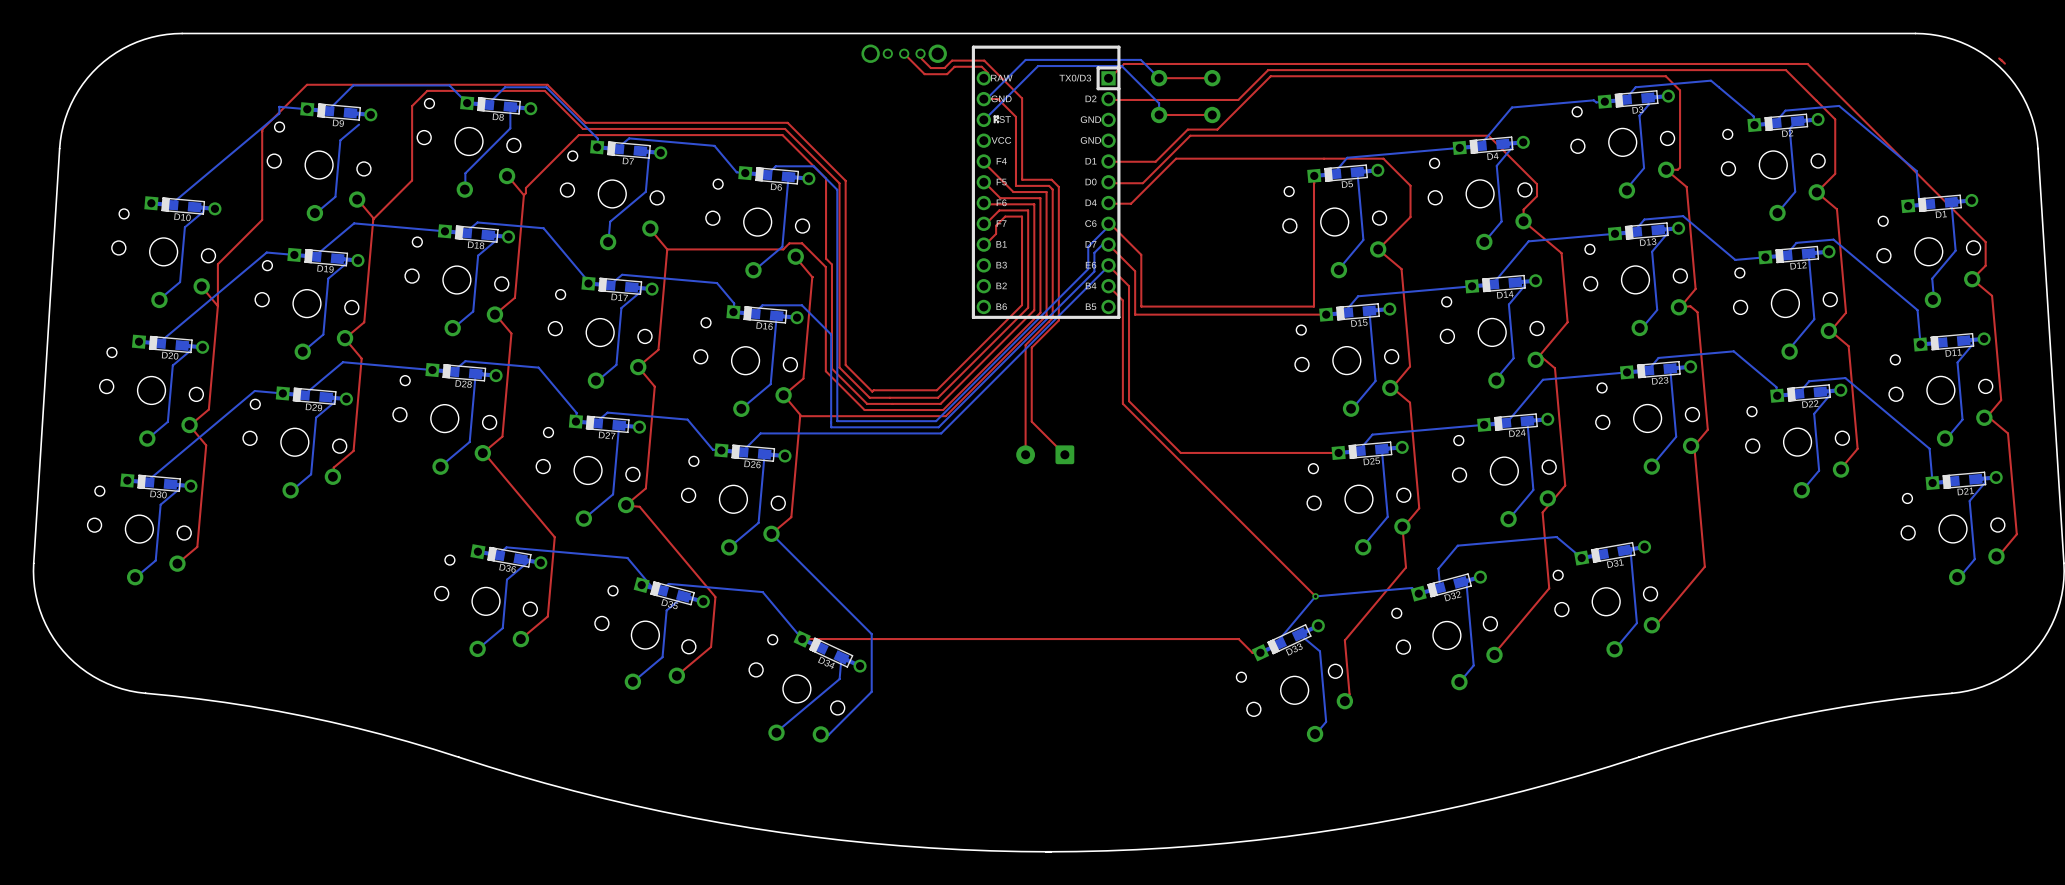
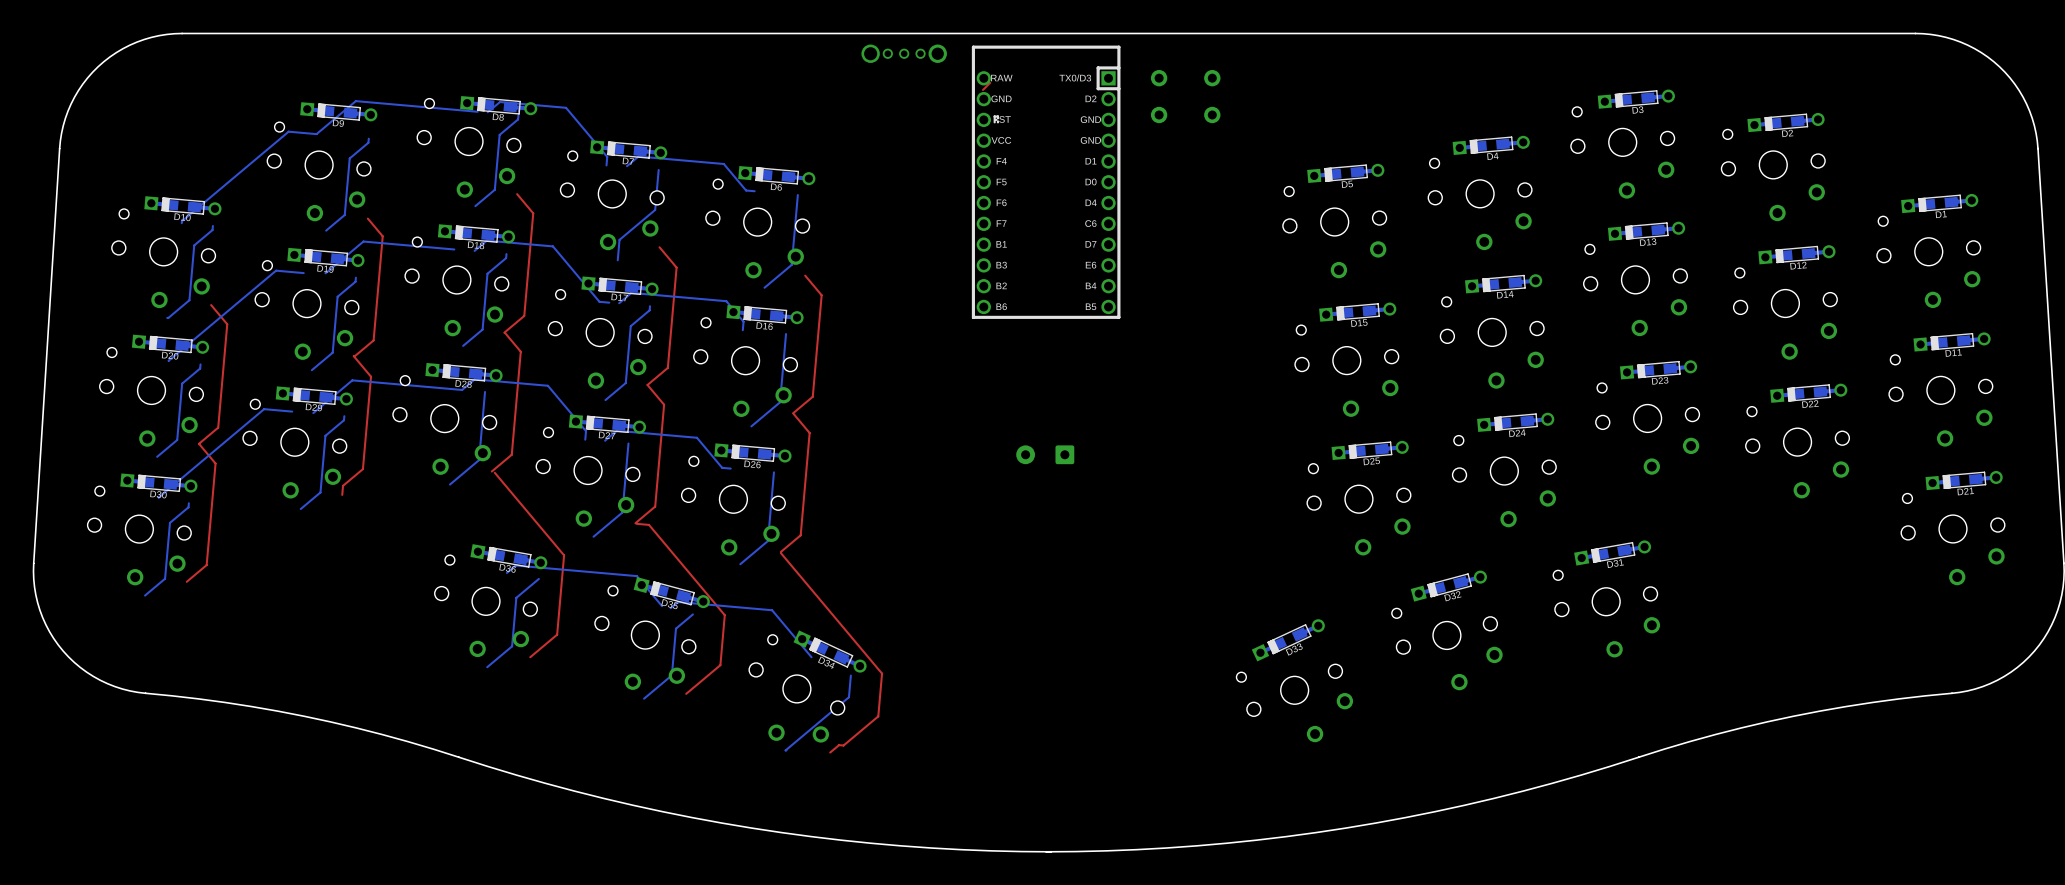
top track: (904, 53) (924, 74) (947, 74) (954, 66) (981, 66) (988, 73) -> none
top track: (921, 54) (921, 58) (930, 68) (944, 68) (952, 60) (984, 60) (1022, 98) (1022, 179) (1051, 179) (1058, 186) (1058, 320) (1031, 347) (1031, 421) (1064, 454) -> none
top track: (1999, 58) (2004, 63) -> none
top track: (1111, 76) (1124, 63) (1807, 63) (1985, 242) (1985, 265) (1972, 279) (1992, 295) (2001, 400) (1987, 416) (2007, 433) (2016, 534) (1999, 554) -> none
bottom track: (1159, 78) (1140, 59) (1025, 59) (986, 99) -> none
top track: (1212, 78) (1160, 78) -> none
top track: none -> (990, 82) (982, 89)
bottom track: (1648, 97) (1648, 104) (1639, 115) (1644, 168) (1629, 185) -> none
top track: (986, 98) (998, 98) (1015, 116) (1015, 185) (1049, 185) (1052, 189) (1052, 317) (1025, 345) (1025, 454) -> none
top track: (1108, 99) (1238, 99) (1268, 70) (1785, 70) (1835, 119) (1835, 173) (1816, 192) (1836, 209) (1846, 312) (1830, 331) (1848, 346) (1857, 448) (1841, 467) -> none
bottom track: (1625, 99) (1635, 87) (1711, 80) (1753, 116) (1754, 125) -> none
bottom track: (1604, 101) (1596, 102) (1593, 100) (1511, 107) (1479, 146) -> none
bottom track: (467, 103) (449, 85) (353, 85) (329, 109) -> none
bottom track: (488, 104) (505, 87) (546, 87) (597, 138) (597, 147) -> none
bottom track: (510, 106) (510, 128) (465, 173) (465, 190) -> none
bottom track: (307, 109) (279, 106) (279, 113) (172, 205) -> none
bottom track: none -> (477, 111) (355, 101) (316, 133)
bottom track: none -> (487, 112) (499, 102) (566, 107) (607, 156) (606, 165)
bottom track: (1159, 114) (1159, 103) (1121, 66) (1038, 66) (983, 120) -> none
top track: (1212, 114) (1157, 114) -> none
bottom track: none -> (518, 115) (518, 119) (499, 134) (494, 189) (475, 206)
bottom track: (1797, 121) (1789, 128) (1795, 191) (1780, 209) -> none
bottom track: (1775, 122) (1785, 110) (1839, 105) (1916, 170) (1919, 205) -> none
bottom track: (359, 124) (340, 140) (335, 196) (316, 212) -> none
bottom track: none -> (316, 134) (288, 131) (181, 223)
bottom track: none -> (368, 138) (368, 142) (349, 158) (344, 215) (326, 230)
bottom track: (1511, 143) (1512, 147) (1496, 165) (1501, 221) (1483, 242) -> none
bottom track: (1471, 146) (1347, 157) (1334, 172) -> none
bottom track: (617, 148) (629, 138) (714, 145) (736, 172) (745, 173) -> (627, 166) (638, 156) (723, 164) (746, 190) (754, 191)
bottom track: (649, 151) (645, 191) (610, 221) (608, 242) -> (658, 170) (655, 209) (619, 239) (617, 260)
top track: (983, 161) (1013, 192) (1046, 192) (1046, 315) (945, 416) (800, 416) -> none
top track: (1109, 161) (1155, 161) (1187, 129) (1217, 129) (1270, 76) (1665, 76) (1680, 90) (1680, 167) (1677, 169) (1666, 169) (1686, 186) (1695, 289) (1681, 306) -> none
bottom track: (1357, 172) (1363, 240) (1340, 266) -> none
bottom track: (765, 174) (775, 166) (813, 166) (837, 189) (837, 421) (936, 421) (1088, 269) (1088, 246) (1106, 228) (1107, 224) -> none
top track: (507, 175) (523, 195) -> none
top track: (1314, 175) (1313, 306) (1141, 306) (1141, 254) (1111, 225) (1108, 225) -> none
bottom track: (788, 176) (782, 246) (755, 269) -> (797, 195) (791, 264) (764, 287)
top track: (984, 182) (1000, 198) (1040, 198) (1040, 312) (943, 410) (864, 410) (825, 371) (825, 267) (802, 243) (789, 243) (783, 249) (667, 249) -> none
top track: (1108, 183) (1142, 183) (1190, 135) (1488, 135) (1537, 184) (1537, 196) (1523, 209) (1523, 221) (1561, 253) (1567, 322) (1539, 355) (1554, 368) (1565, 485) (1542, 512) (1549, 588) (1498, 649) -> none
top track: none -> (517, 194) (533, 213) (524, 315) (504, 332)
top track: (523, 195) (514, 297) (494, 314) -> none
top track: (523, 195) (525, 187) (578, 135) (782, 135) (826, 178) (826, 258) (831, 264) (831, 368) (867, 403) (940, 403) (1034, 310) (1034, 204) (989, 204) (986, 201) -> none
top track: (358, 200) (373, 218) (364, 322) (344, 338) (361, 358) (353, 450) (333, 467) (332, 476) -> (367, 218) (382, 236) (373, 340) (353, 356) (371, 376) (362, 469) (343, 485) (342, 494)
bottom track: (1951, 202) (1955, 250) (1932, 278) (1934, 304) -> none
top track: (1110, 203) (1131, 203) (1176, 158) (1383, 158) (1410, 185) (1410, 217) (1378, 249) (1401, 269) (1410, 366) (1392, 387) (1410, 402) (1419, 508) (1402, 528) -> none
bottom track: (203, 207) (203, 211) (184, 227) (180, 282) (157, 299) -> (212, 225) (212, 230) (194, 245) (189, 300) (167, 317)
top track: (373, 219) (412, 180) (412, 106) (427, 90) (544, 90) (582, 128) (785, 128) (839, 183) (839, 367) (869, 397) (938, 397) (1028, 307) (1028, 210) (999, 210) (984, 223) -> none
top track: (650, 229) (667, 249) -> none
bottom track: (1667, 229) (1667, 233) (1652, 251) (1657, 310) (1642, 327) -> none
bottom track: (1634, 230) (1644, 219) (1683, 216) (1735, 259) (1765, 257) -> none
bottom track: (444, 231) (354, 223) (316, 255) -> (454, 249) (363, 241) (325, 273)
bottom track: (465, 232) (477, 222) (543, 228) (590, 283) (599, 284) -> (474, 250) (486, 240) (552, 246) (599, 301) (609, 302)
bottom track: (1615, 233) (1528, 241) (1492, 284) -> none
bottom track: (497, 235) (496, 239) (478, 255) (473, 311) (453, 327) -> (506, 254) (506, 258) (487, 273) (482, 329) (463, 345)
bottom track: (1106, 244) (1102, 244) (1094, 252) (1094, 271) (938, 427) (831, 427) (831, 334) (801, 305) (762, 305) (753, 313) -> none
top track: (984, 245) (996, 233) (996, 225) (1005, 216) (1022, 216) (1022, 305) (936, 390) (872, 391) (845, 365) (845, 180) (787, 122) (585, 122) (547, 84) (307, 84) (262, 129) (262, 219) (217, 264) (217, 306) -> none
top track: (1110, 246) (1135, 271) (1135, 314) -> none
top track: none -> (659, 247) (676, 267) (667, 367) (647, 384) (664, 404) (655, 506) (635, 523)
top track: (667, 249) (658, 349) (638, 366) (654, 386) (645, 488) (626, 505) -> none
bottom track: (1787, 253) (1796, 242) (1833, 239) (1917, 310) (1920, 344) -> none
bottom track: (1808, 253) (1814, 319) (1788, 349) -> none
bottom track: (294, 254) (266, 252) (159, 342) -> (303, 273) (276, 270) (168, 360)
top track: (795, 257) (812, 277) -> none
bottom track: (346, 259) (346, 263) (328, 278) (323, 334) (302, 352) -> (355, 277) (355, 281) (337, 296) (332, 352) (311, 370)
bottom track: (1109, 264) (941, 433) (760, 433) (741, 452) -> none
top track: (1108, 265) (1129, 286) (1129, 401) (1180, 452) (1338, 452) -> none
top track: none -> (805, 275) (821, 295) (812, 396) (792, 413)
top track: (812, 277) (812, 277) -> none
top track: (812, 277) (803, 378) (783, 395) -> none
bottom track: (1524, 281) (1524, 285) (1508, 304) (1513, 358) (1496, 378) -> none
bottom track: (609, 285) (622, 274) (717, 283) (734, 303) (733, 312) -> (619, 303) (631, 292) (726, 301) (743, 321) (742, 330)
bottom track: (1483, 285) (1358, 296) (1344, 311) -> none
top track: (201, 286) (217, 306) -> none
top track: (1108, 286) (1122, 300) (1122, 403) (1315, 596) -> none
bottom track: (640, 288) (640, 292) (621, 308) (616, 364) (596, 381) -> (650, 306) (649, 310) (630, 326) (625, 383) (605, 400)
top track: none -> (211, 305) (227, 324) (218, 427) (199, 443) (215, 463) (206, 565) (186, 581)
top track: (217, 306) (208, 409) (189, 425) (206, 445) (197, 546) (177, 563) -> none
top track: (1678, 307) (1690, 306) (1697, 312) (1707, 429) (1694, 445) (1704, 566) (1655, 625) -> none
bottom track: (1369, 310) (1375, 381) (1352, 408) -> none
top track: (495, 314) (511, 333) (502, 436) (482, 453) -> (504, 332) (520, 351) (511, 454) (491, 471)
top track: (1326, 314) (1135, 314) -> none
bottom track: (776, 315) (770, 384) (742, 408) -> (786, 334) (780, 402) (751, 426)
bottom track: (1972, 339) (1973, 343) (1957, 362) (1962, 419) (1947, 437) -> none
bottom track: (191, 346) (190, 350) (172, 365) (167, 421) (147, 438) -> (200, 364) (200, 368) (182, 383) (177, 440) (157, 456)
bottom track: (1670, 368) (1676, 436) (1652, 465) -> none
bottom track: (1647, 370) (1658, 357) (1733, 351) (1776, 387) (1777, 395) -> none
bottom track: (452, 371) (343, 362) (303, 394) -> (462, 389) (352, 380) (313, 413)
bottom track: (453, 371) (465, 361) (538, 367) (576, 413) (575, 421) -> (462, 389) (474, 379) (547, 385) (586, 431) (585, 439)
bottom track: (1627, 372) (1542, 379) (1506, 422) -> none
bottom track: (475, 373) (469, 441) (440, 466) -> (485, 391) (479, 460) (449, 484)
bottom track: (1829, 391) (1829, 395) (1814, 413) (1819, 470) (1803, 489) -> none
bottom track: (1800, 392) (1809, 381) (1845, 378) (1929, 448) (1932, 483) -> none
bottom track: (282, 393) (254, 391) (149, 479) -> (292, 411) (264, 409) (158, 497)
top track: (784, 396) (800, 414) (791, 517) (771, 533) -> (794, 414) (809, 432) (800, 535) (780, 551)
bottom track: (335, 398) (334, 402) (316, 417) (311, 474) (291, 490) -> (344, 416) (344, 420) (325, 435) (320, 492) (300, 509)
bottom track: (1527, 421) (1533, 489) (1509, 518) -> none
bottom track: (595, 422) (607, 412) (687, 419) (712, 449) (721, 450) -> (605, 440) (616, 430) (696, 437) (722, 467) (730, 468)
bottom track: (1484, 424) (1372, 434) (1359, 449) -> none
bottom track: (619, 425) (613, 494) (584, 518) -> (628, 443) (622, 512) (593, 536)
bottom track: (1381, 449) (1387, 516) (1364, 544) -> none
top track: (485, 454) (554, 537) (547, 616) (520, 639) -> (494, 472) (564, 555) (557, 634) (530, 657)
bottom track: (764, 454) (758, 522) (730, 546) -> (773, 472) (767, 541) (740, 564)
bottom track: (1984, 478) (1985, 482) (1969, 500) (1974, 559) (1959, 577) -> none
bottom track: (179, 485) (179, 489) (160, 504) (155, 560) (135, 577) -> (188, 503) (188, 507) (169, 522) (165, 578) (145, 595)
top track: (627, 505) (639, 506) (715, 597) (711, 647) (676, 675) -> (636, 523) (649, 524) (724, 615) (720, 665) (686, 693)
top track: (1402, 526) (1406, 567) (1344, 640) (1349, 694) (1342, 702) -> none
bottom track: (771, 533) (871, 634) (871, 691) (828, 734) (820, 734) -> none
bottom track: (1633, 548) (1630, 552) (1636, 623) (1614, 649) -> none
top track: none -> (780, 553) (882, 673) (878, 716) (843, 745) (839, 745) (830, 752)
bottom track: (497, 554) (506, 547) (627, 557) (652, 588) -> (506, 572) (515, 565) (636, 576) (662, 606)
bottom track: (1581, 558) (1556, 537) (1457, 545) (1438, 568) (1440, 586) -> none
bottom track: (529, 560) (507, 579) (502, 628) (477, 649) -> (538, 578) (516, 597) (512, 646) (487, 667)
bottom track: (1469, 580) (1466, 583) (1473, 665) (1460, 681) -> none
bottom track: (661, 590) (668, 583) (762, 592) (802, 639) -> (670, 608) (678, 602) (772, 610) (811, 657)
bottom track: (1418, 593) (1412, 587) (1315, 596) (1279, 641) -> none
bottom track: (683, 596) (666, 610) (662, 657) (634, 680) -> (692, 614) (675, 628) (671, 675) (644, 698)
via: (1315, 596) -> none
bottom track: (1299, 634) (1320, 651) (1326, 721) (1316, 733) -> none
top track: (802, 639) (1238, 639) (1252, 652) (1260, 652) -> none
bottom track: (841, 657) (839, 679) (776, 732) -> (850, 675) (848, 697) (786, 750)

